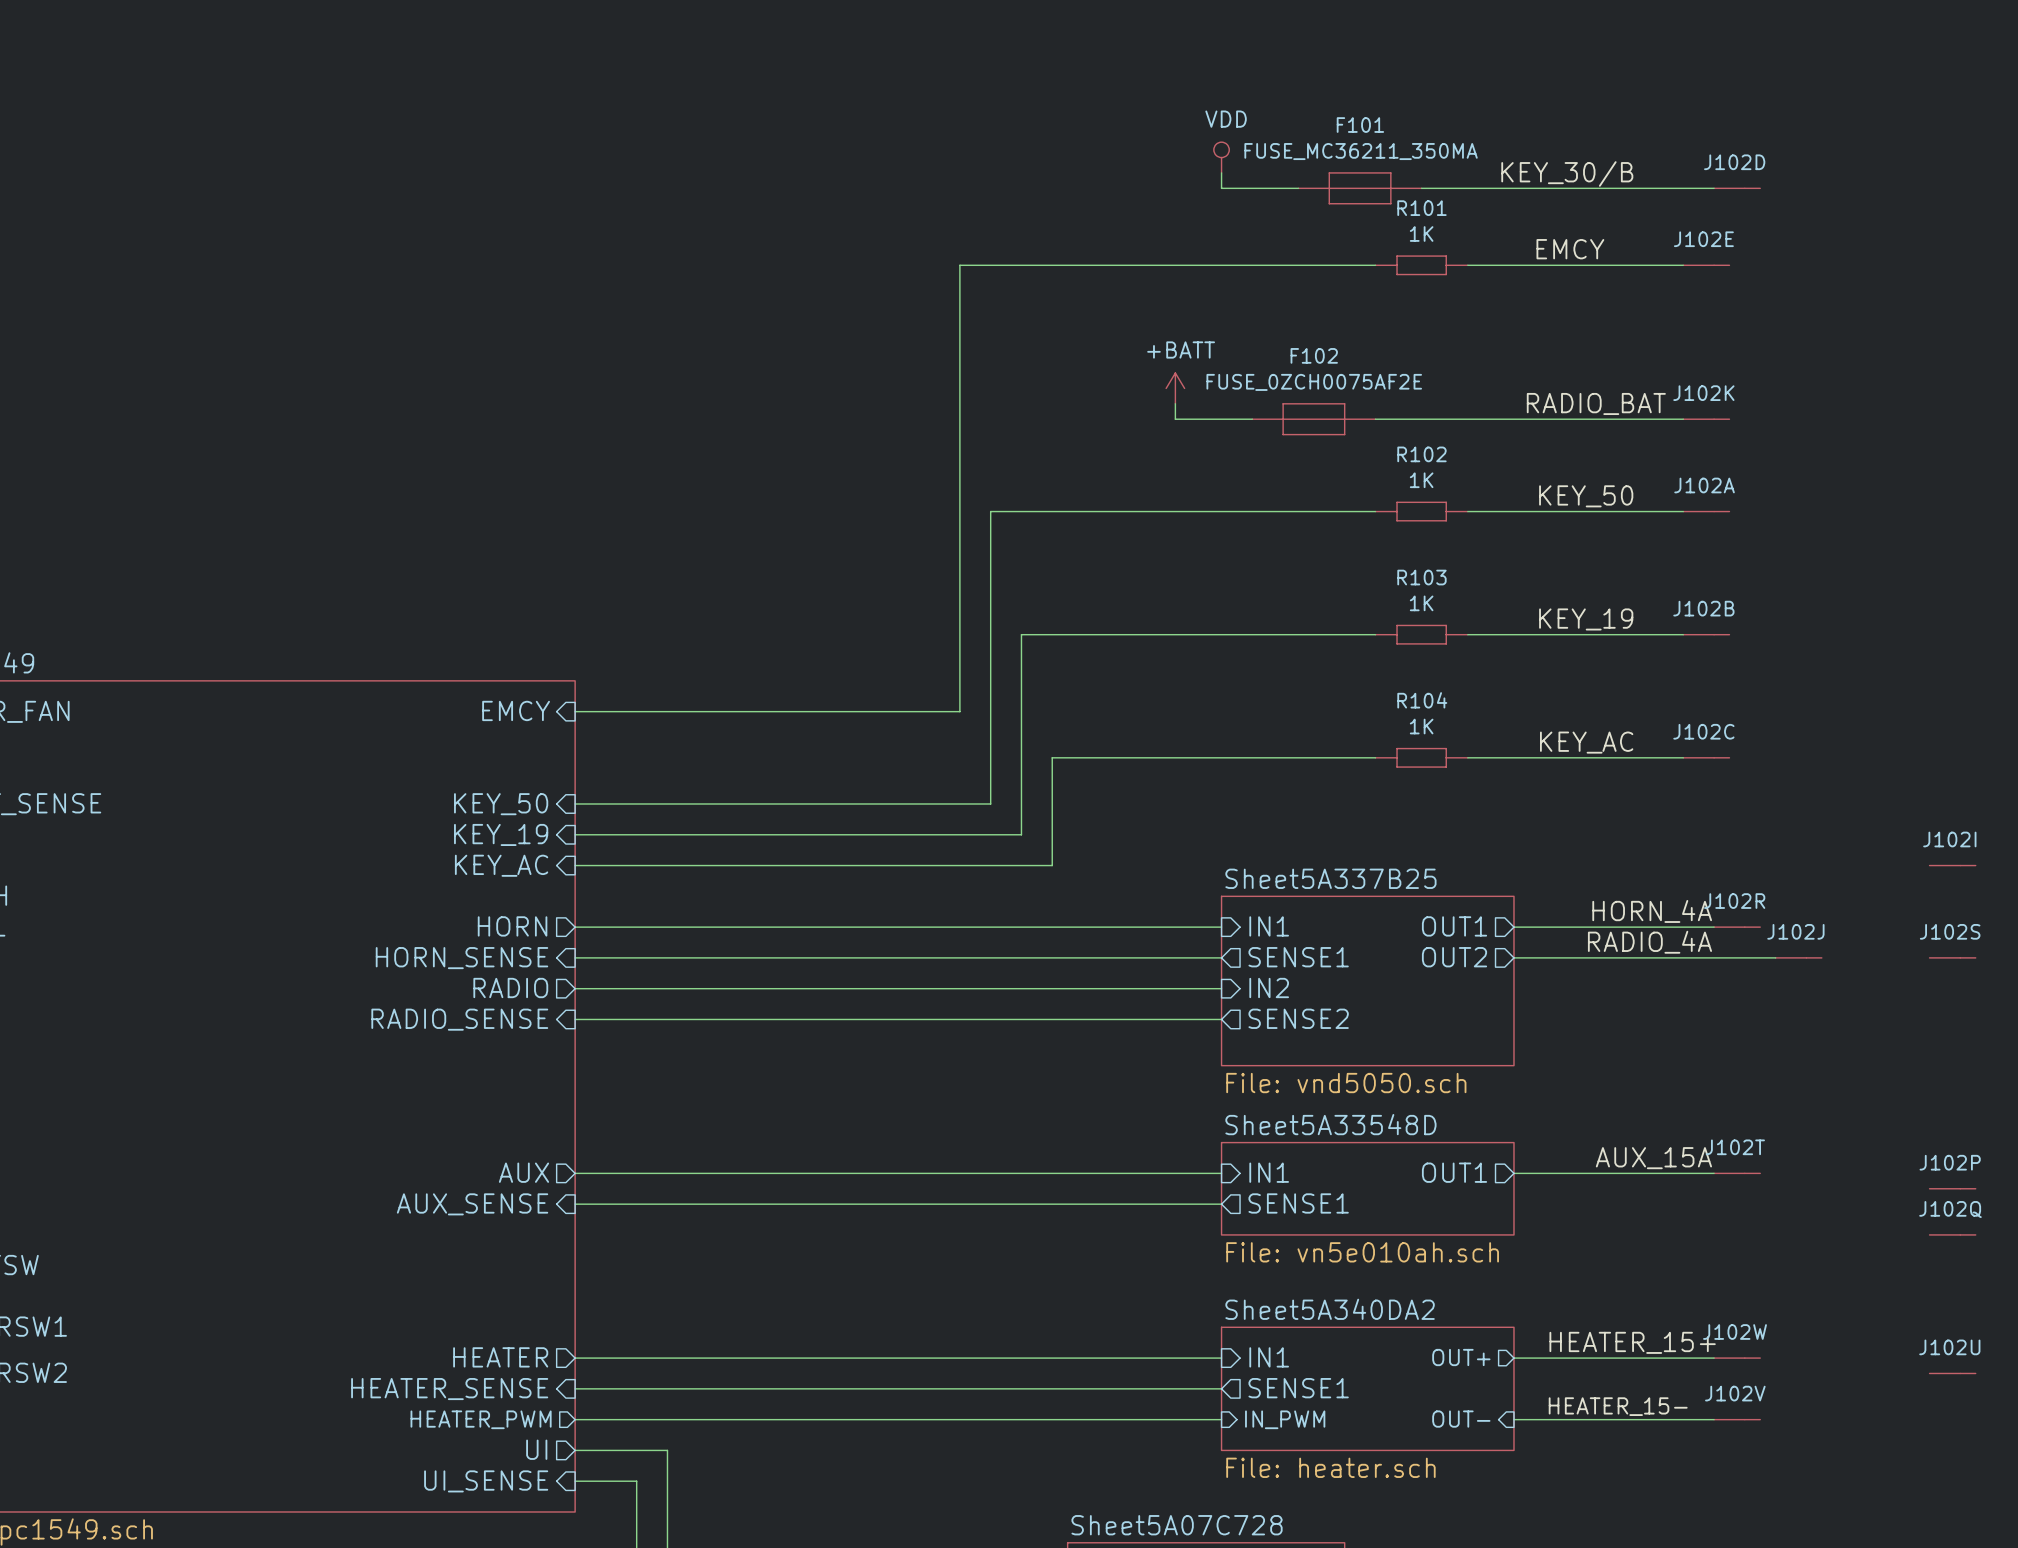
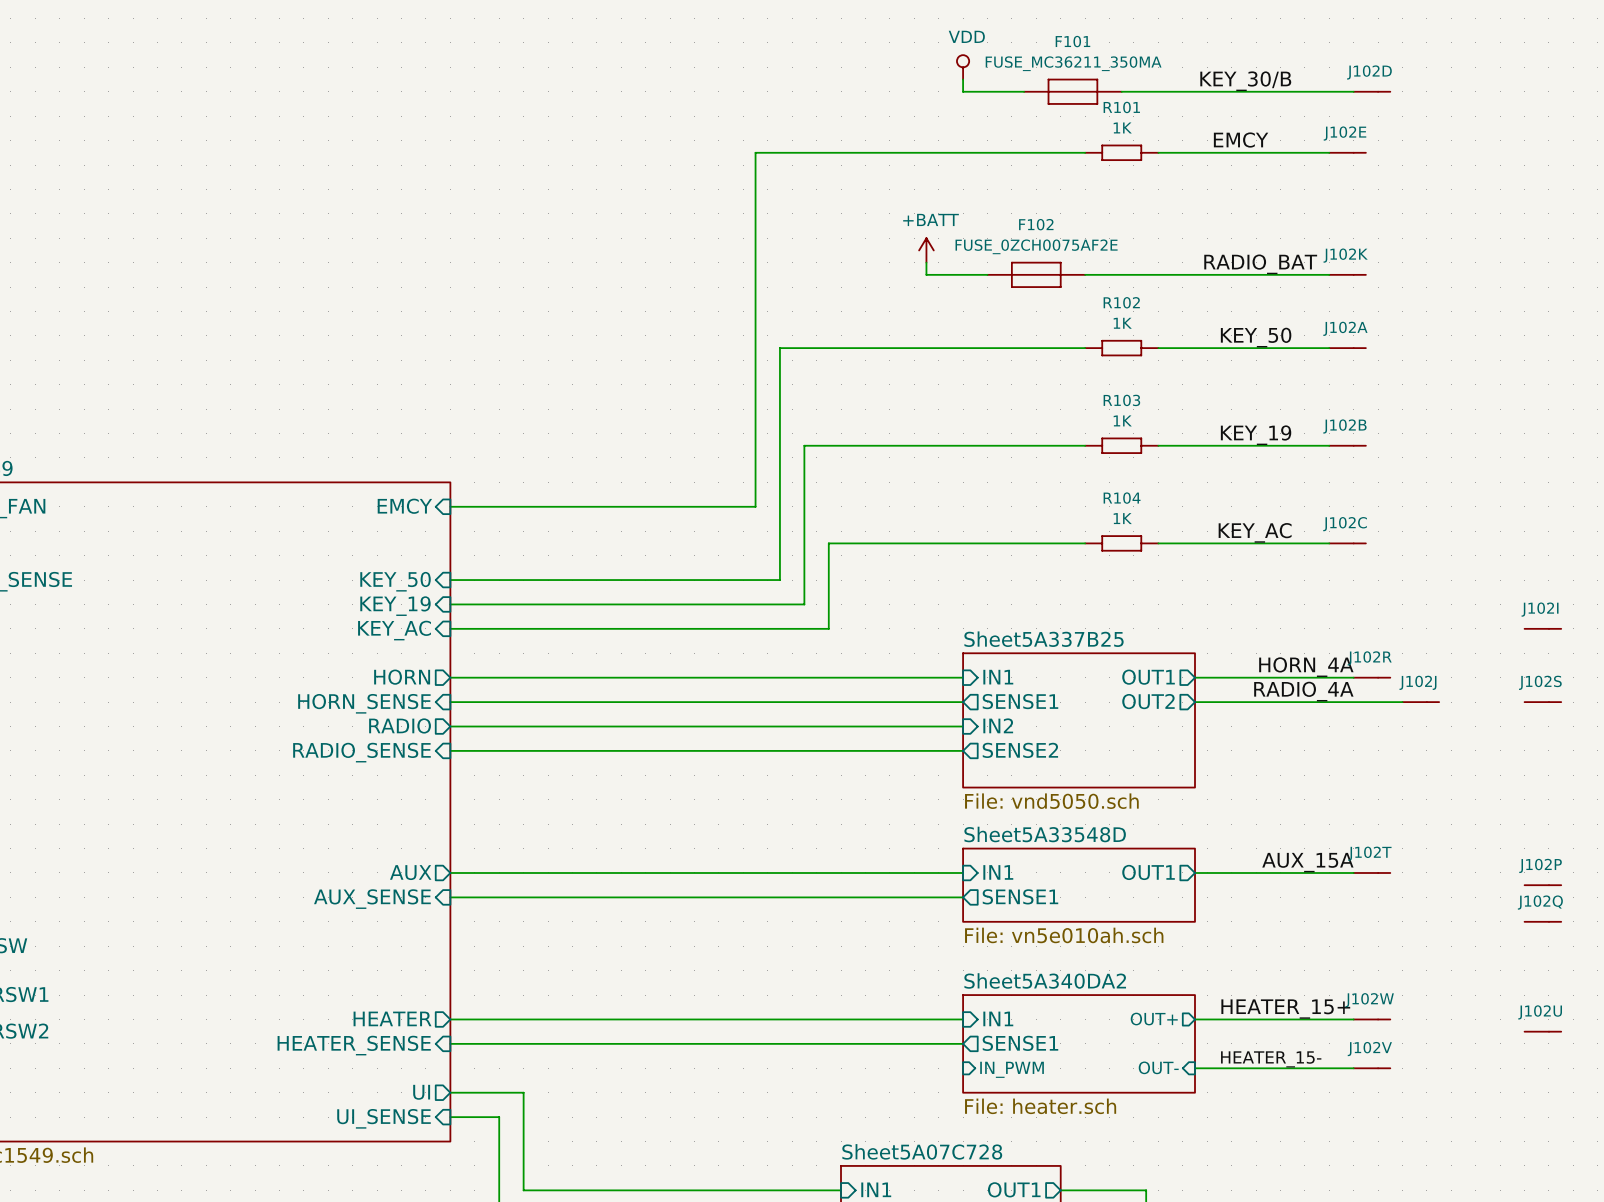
sheet pin: HEATER_PWM (481, 1419) -> none
wire: (575, 1419) (1221, 1419) -> none

